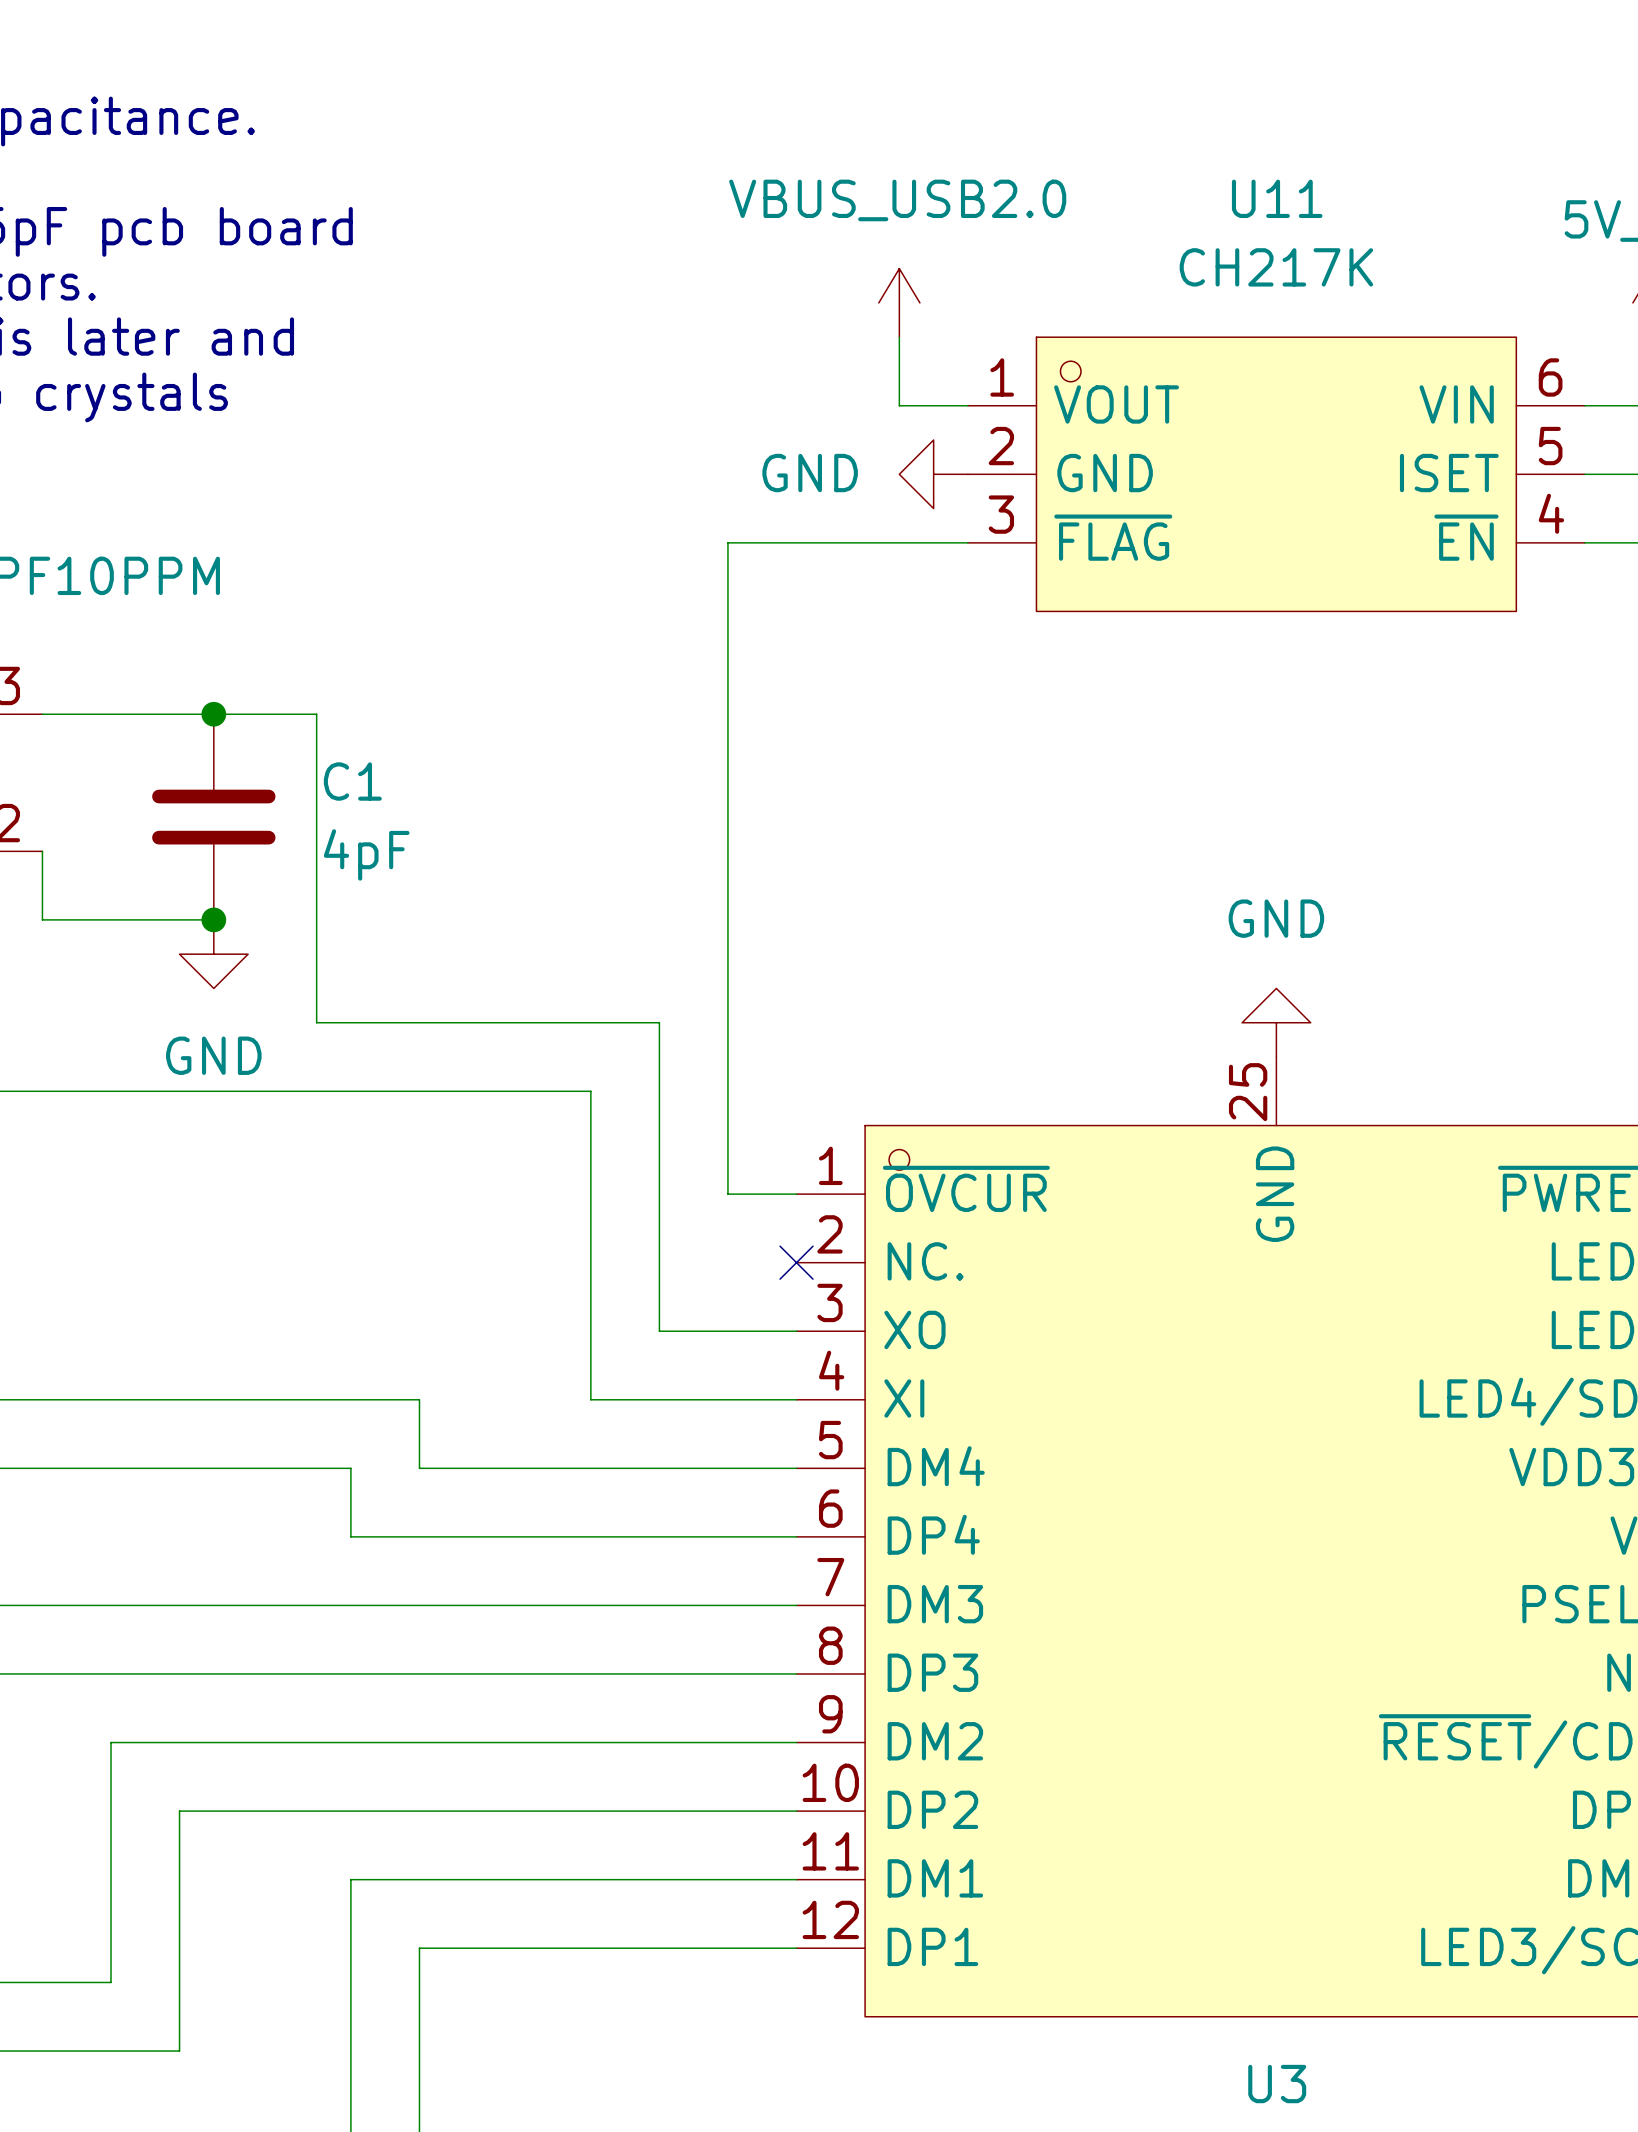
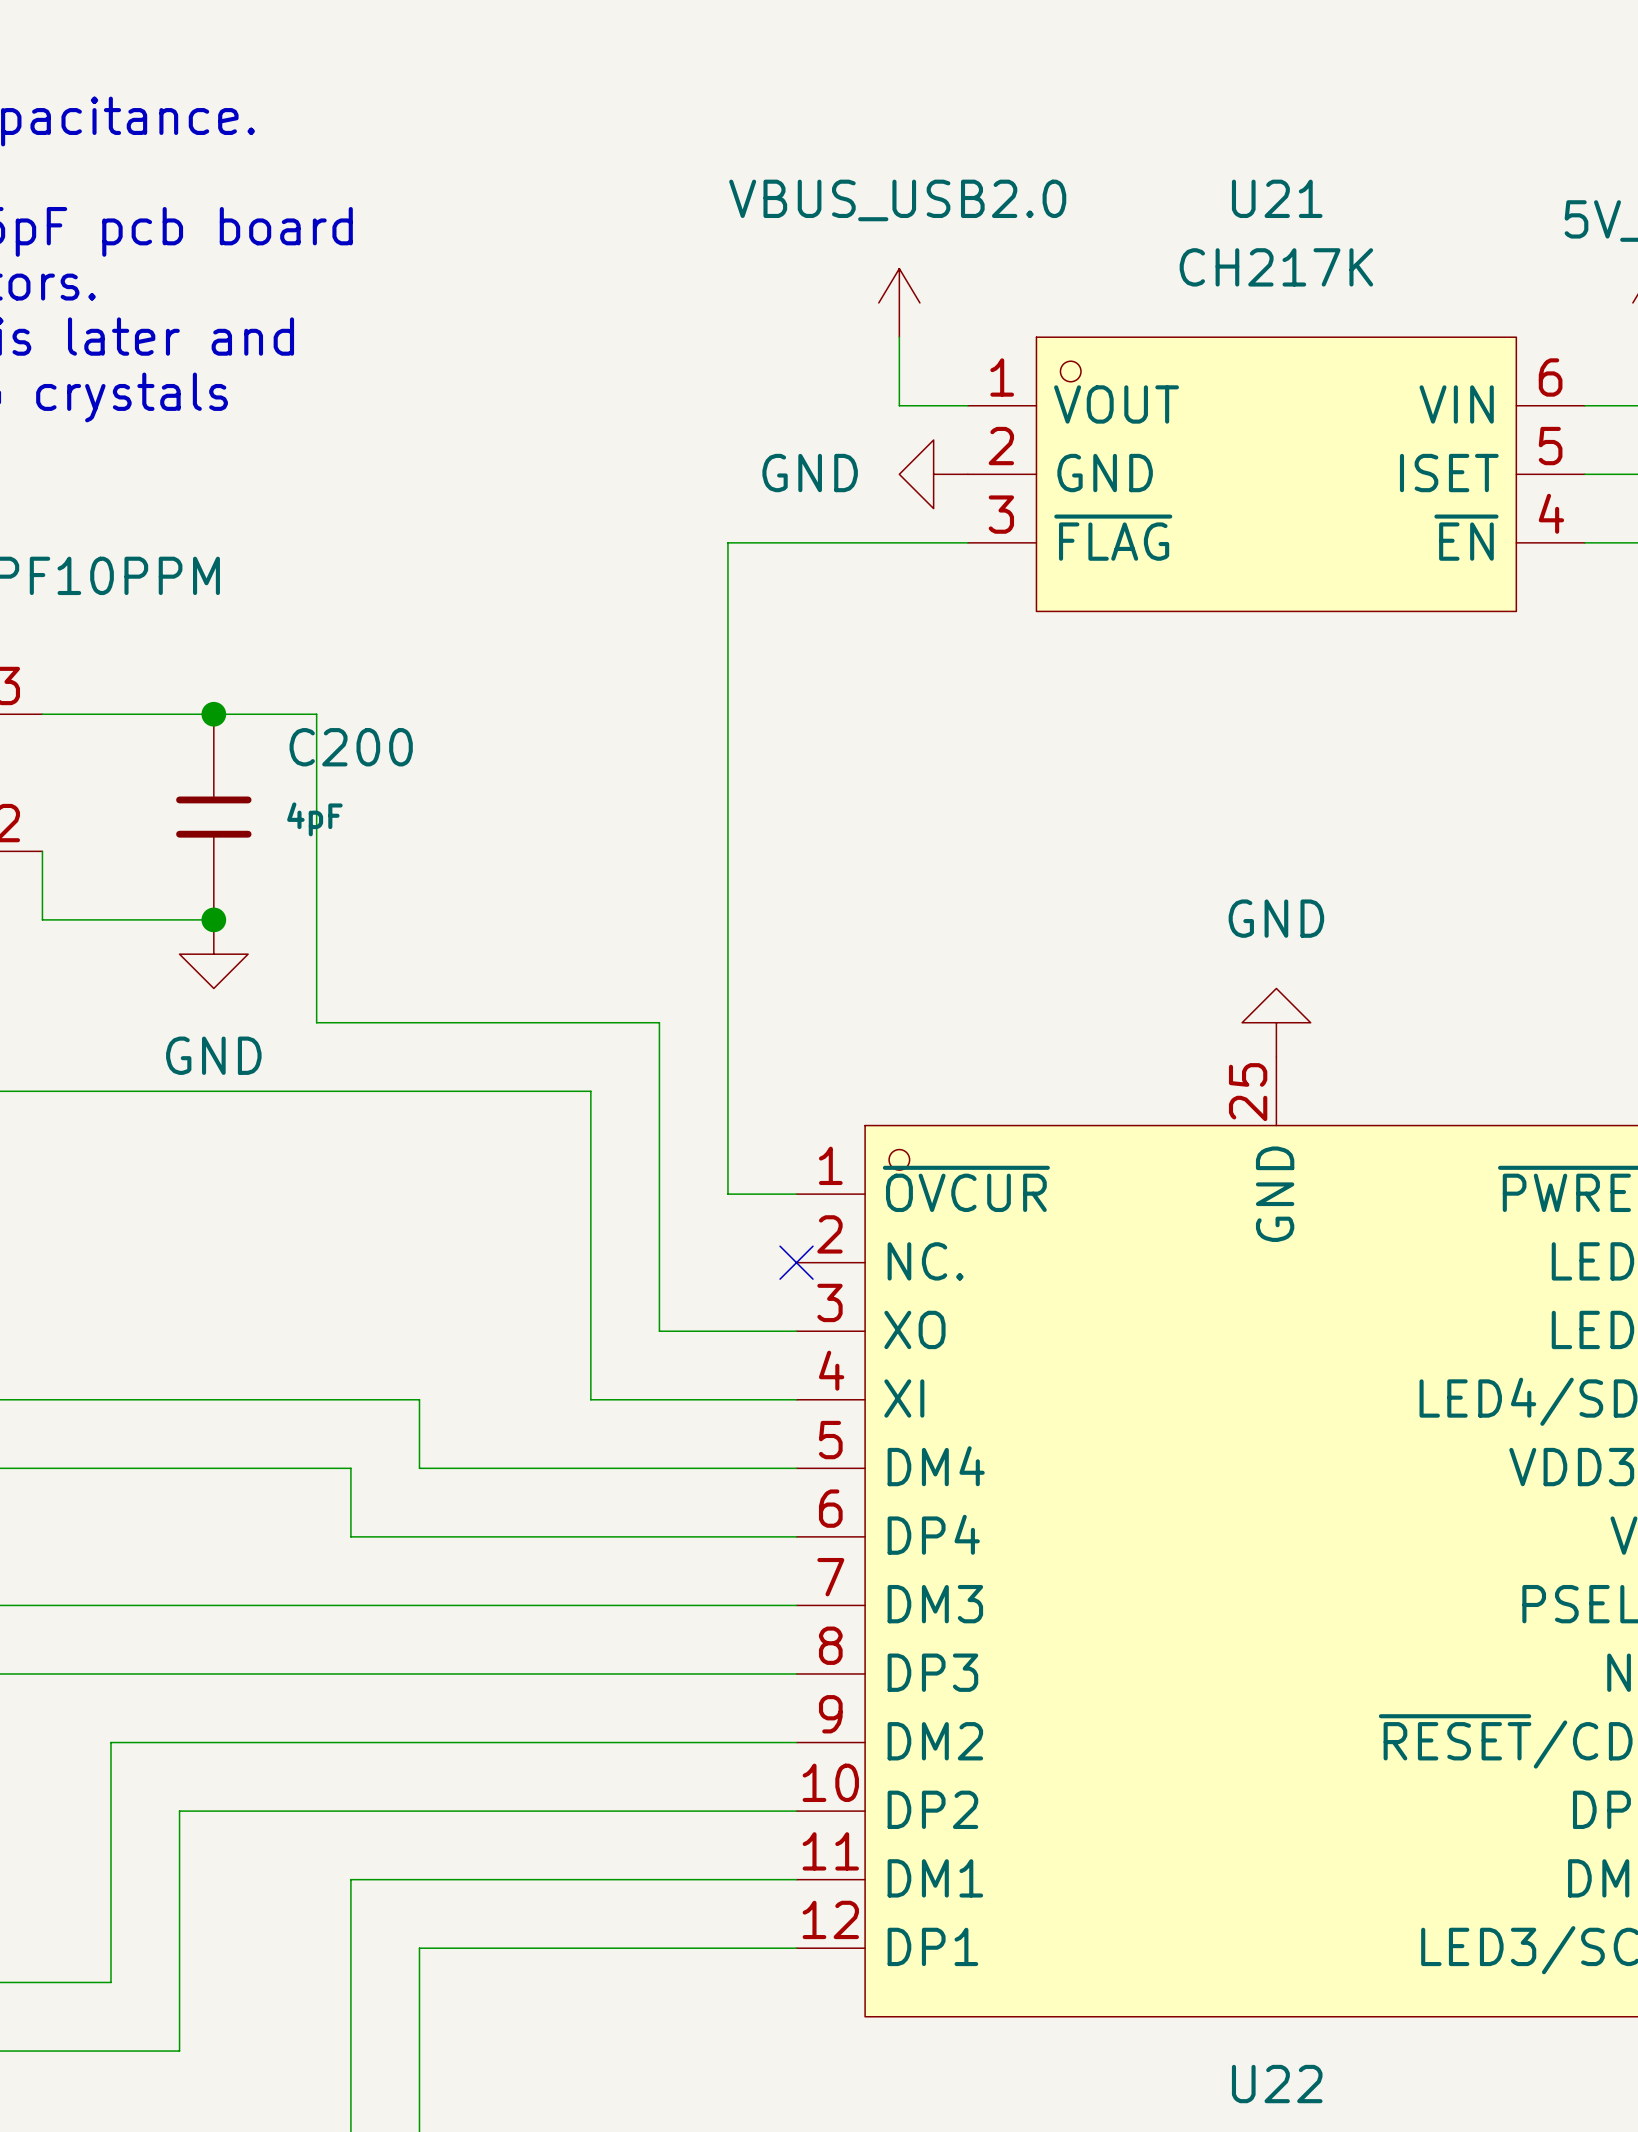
U11 name: U11 (1277, 198) -> U21 (1277, 198)
C1: 4pF (213, 817) -> none
C200: none -> 4pF (213, 817)
U3 name: U3 (1277, 2084) -> U22 (1277, 2084)

